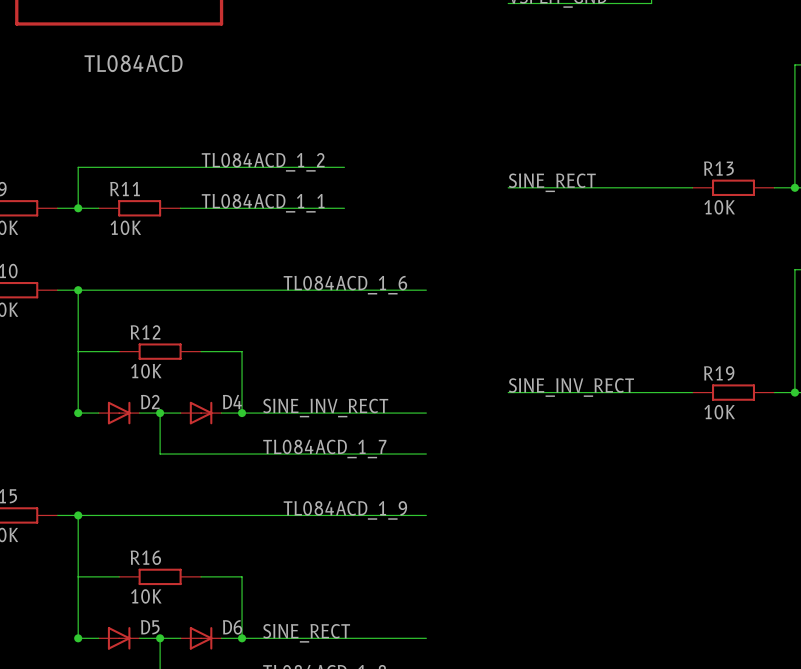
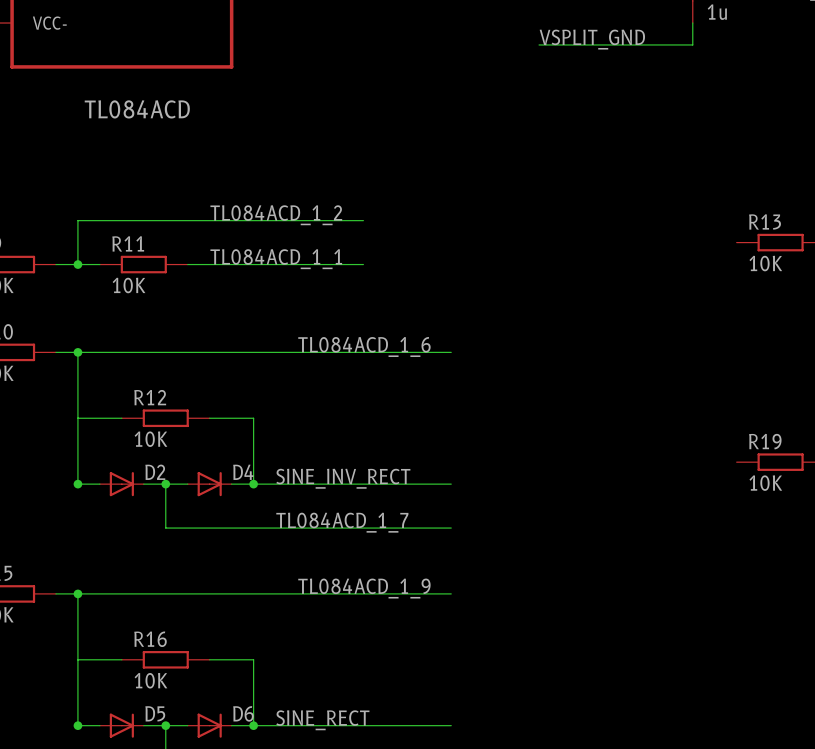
label: SINE_RECT (552, 182) -> none
wire: (508, 187) (692, 187) -> none
label: SINE_INV_RECT (571, 387) -> none
wire: (508, 392) (692, 392) -> none

